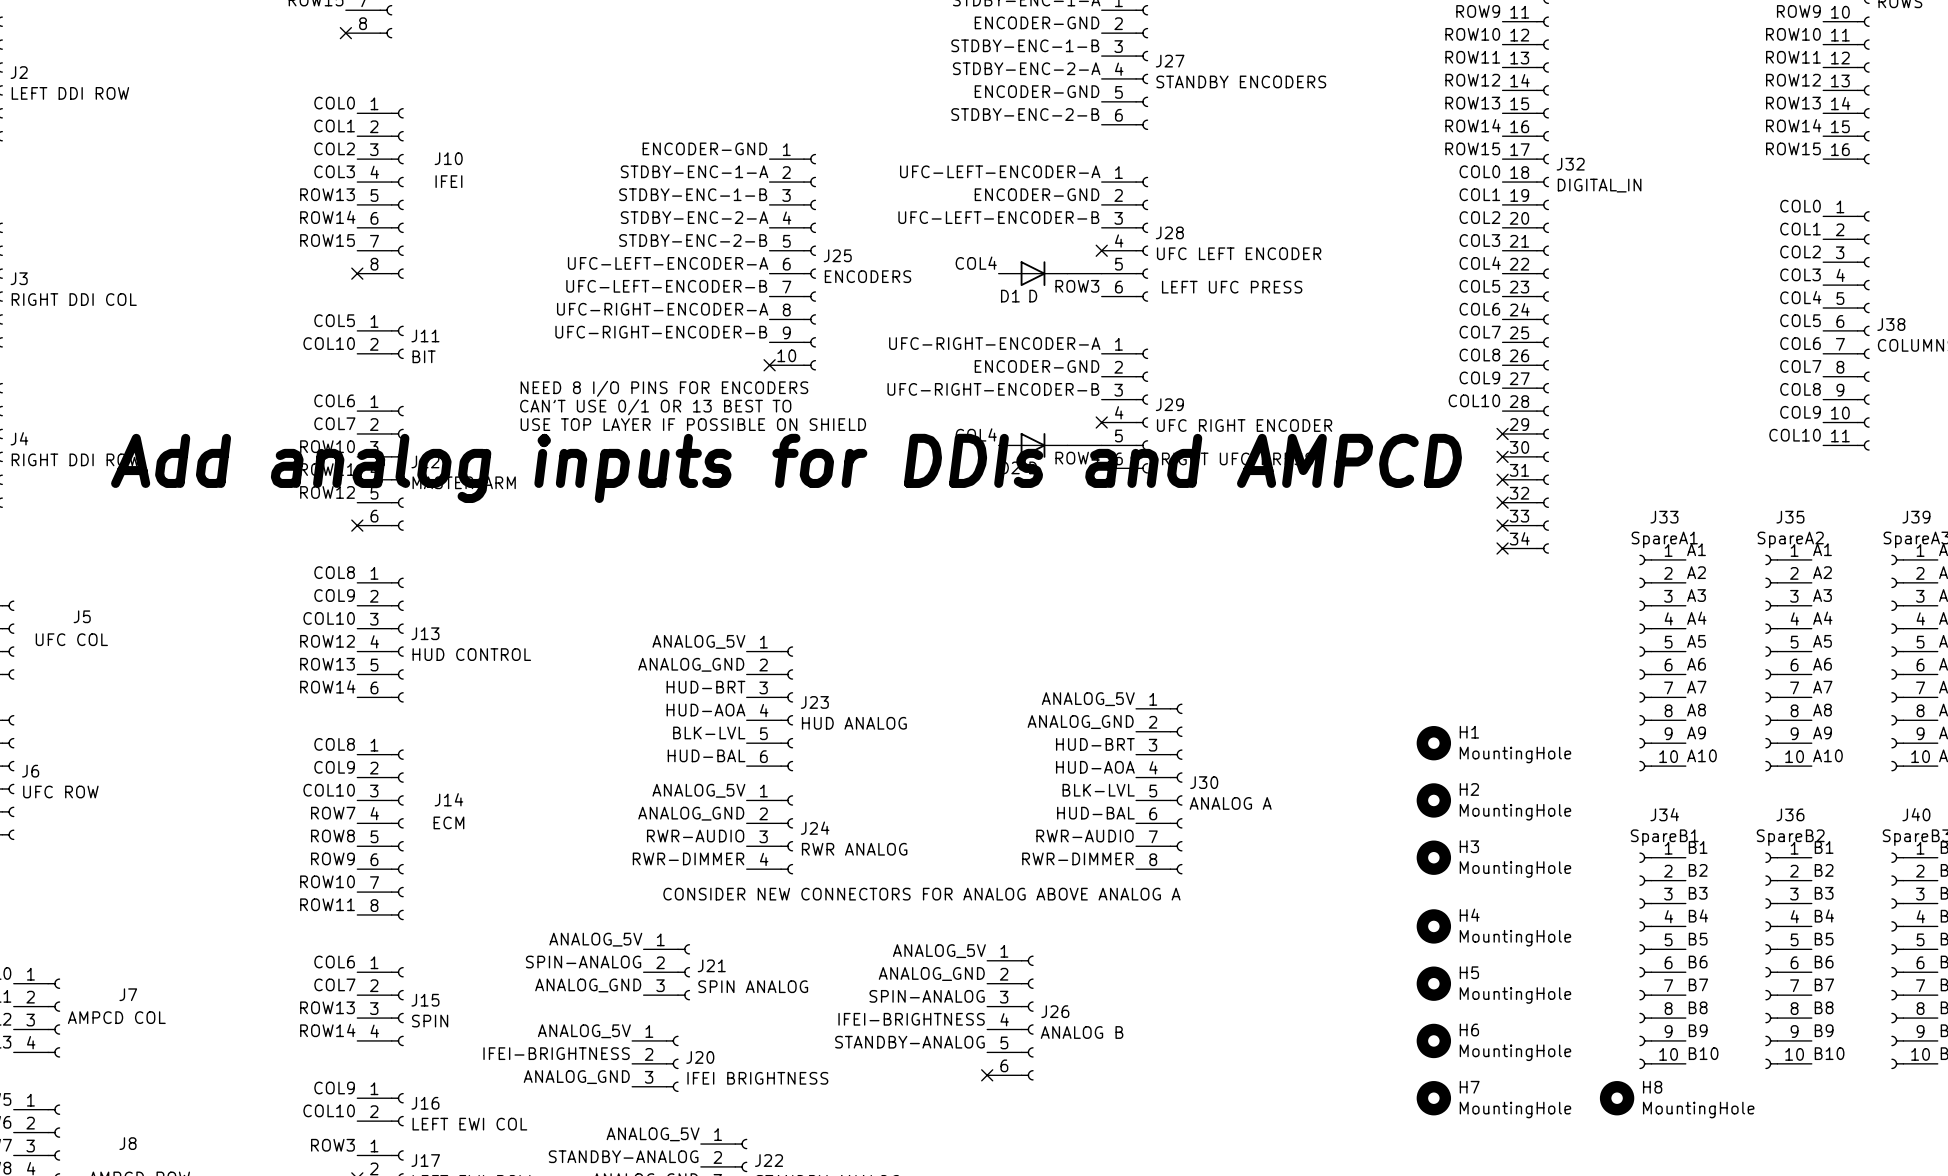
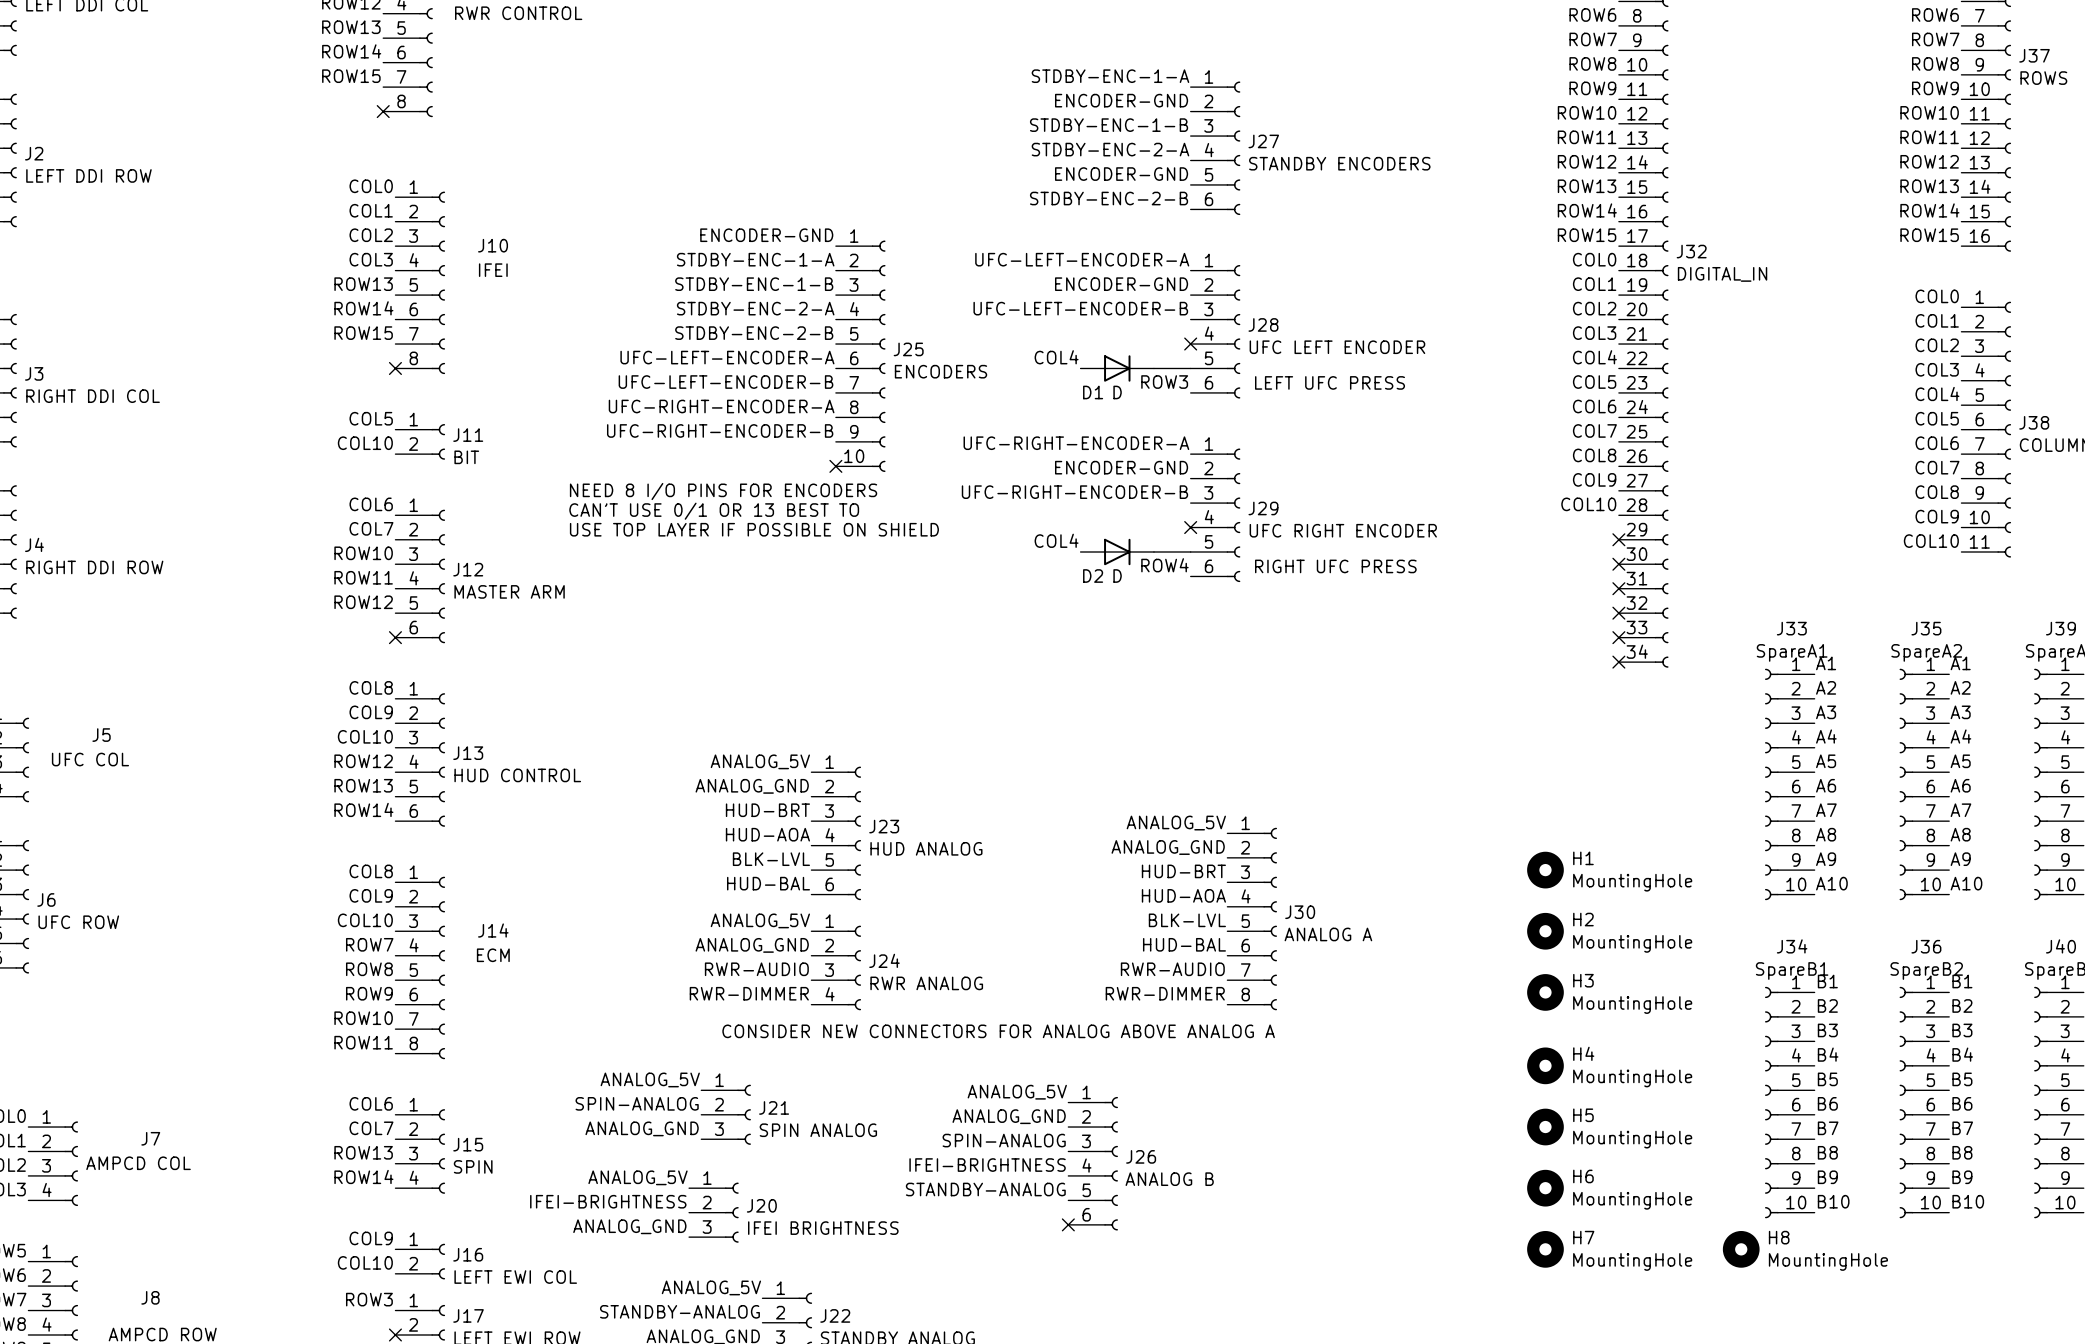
text: Add analog inputs for DDIs and AMPCD (786, 468) -> none

